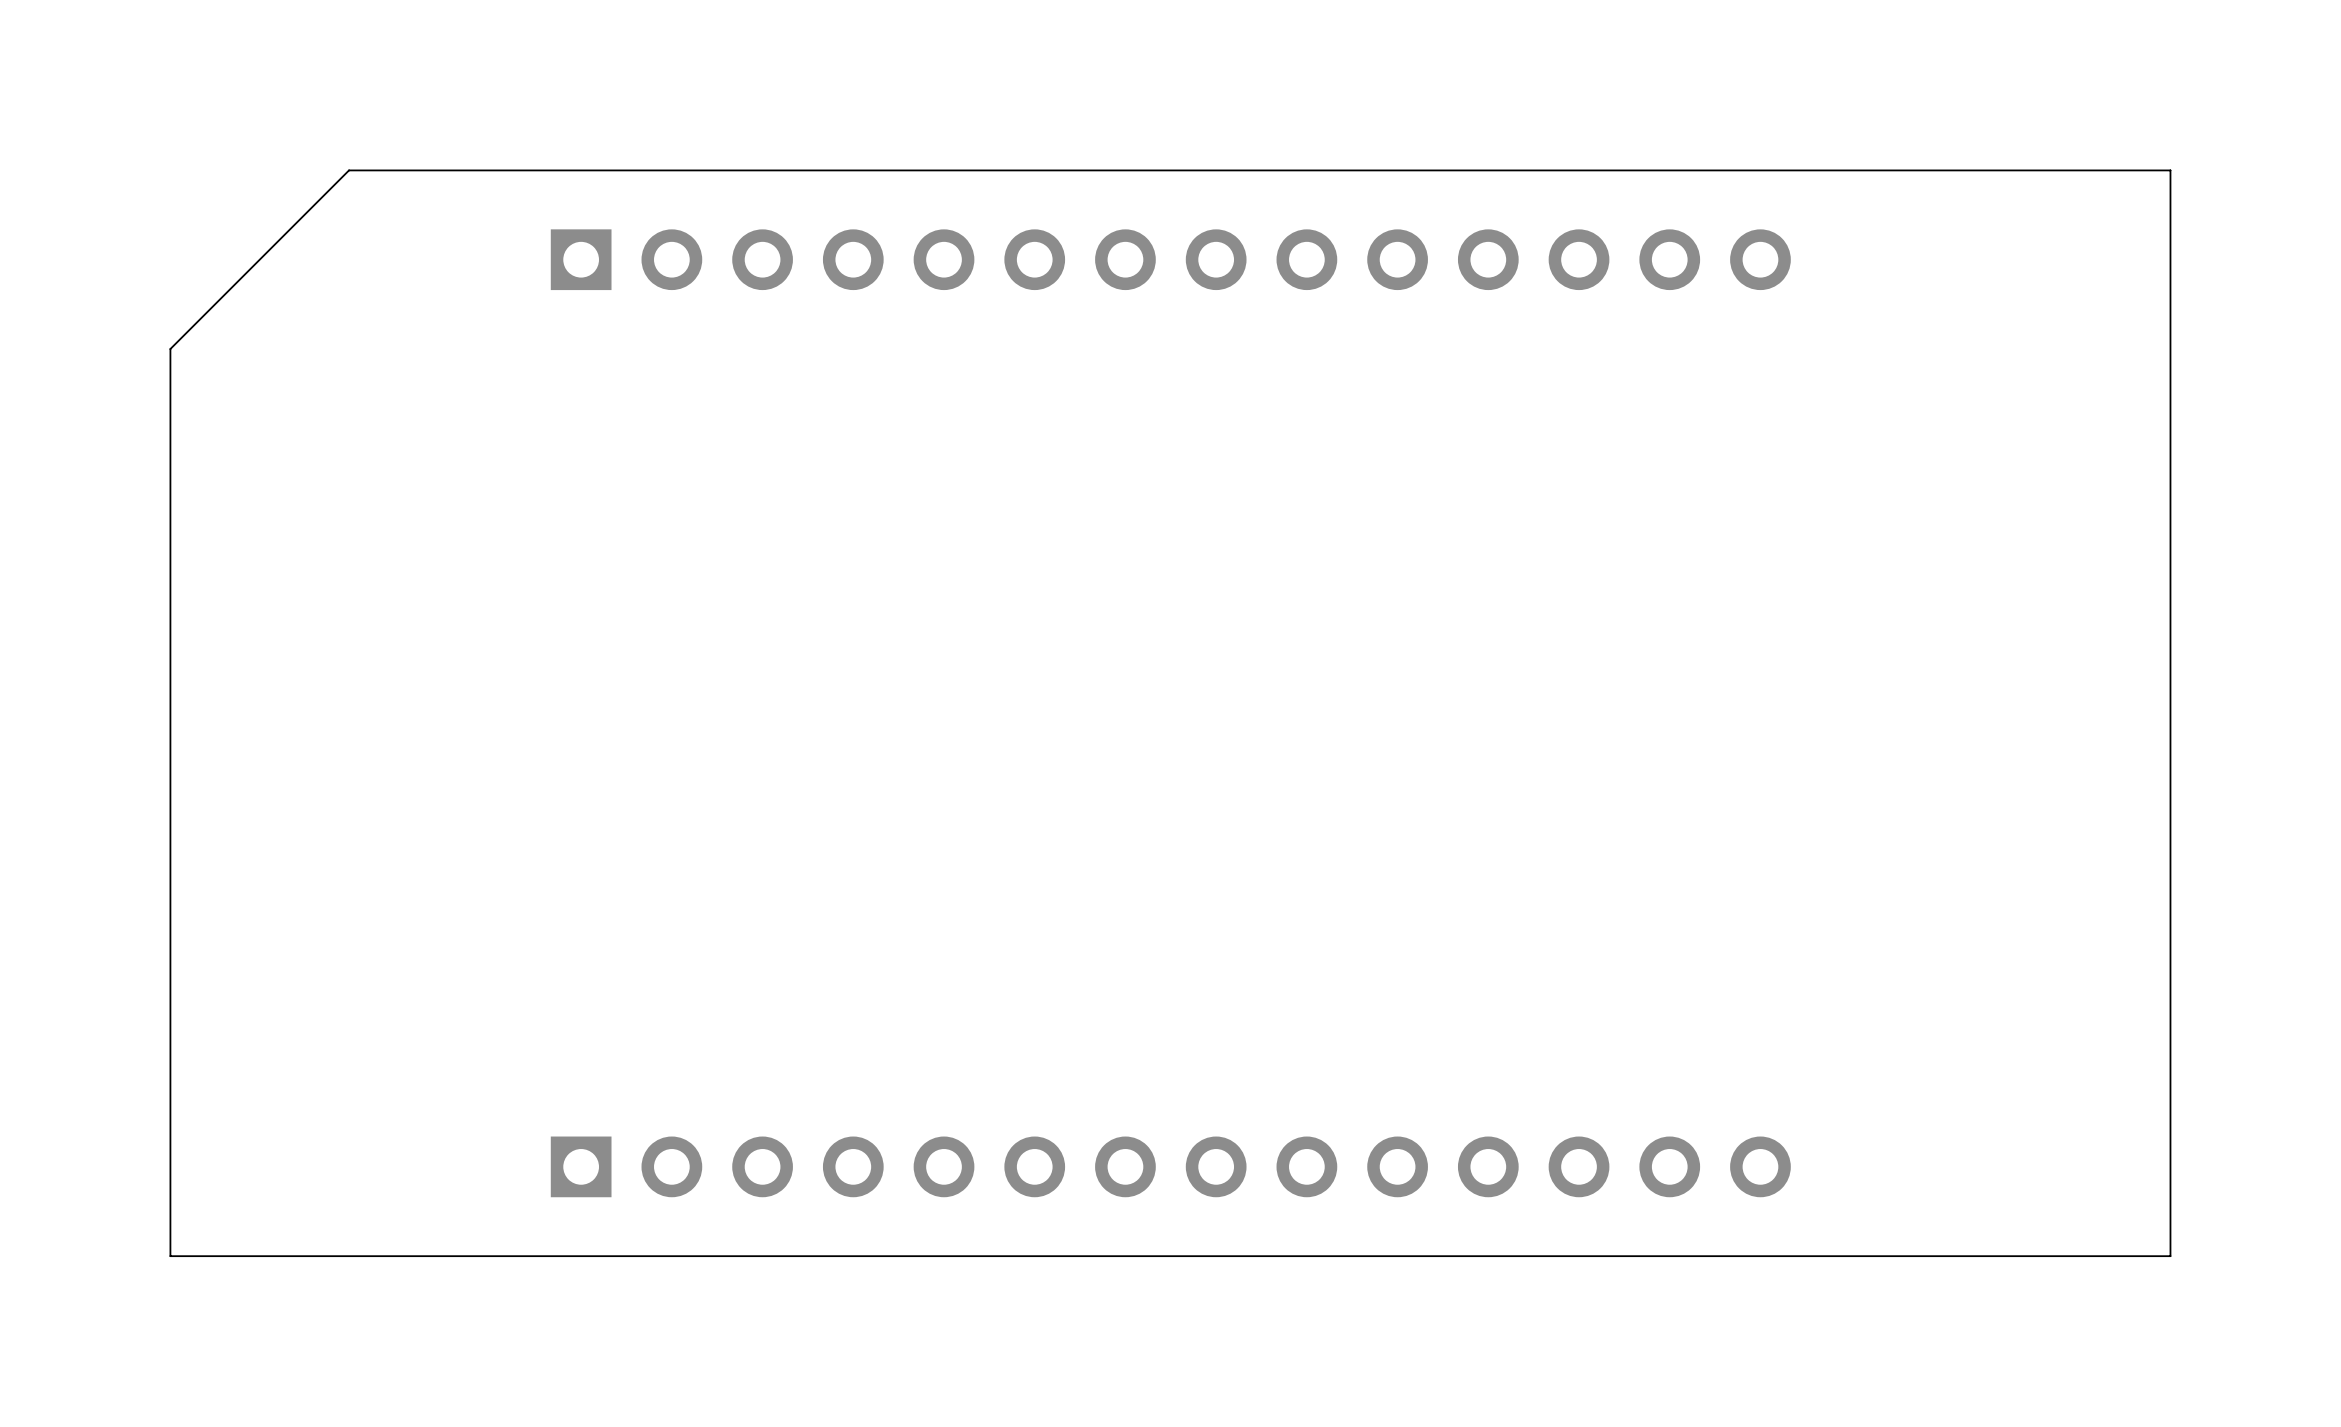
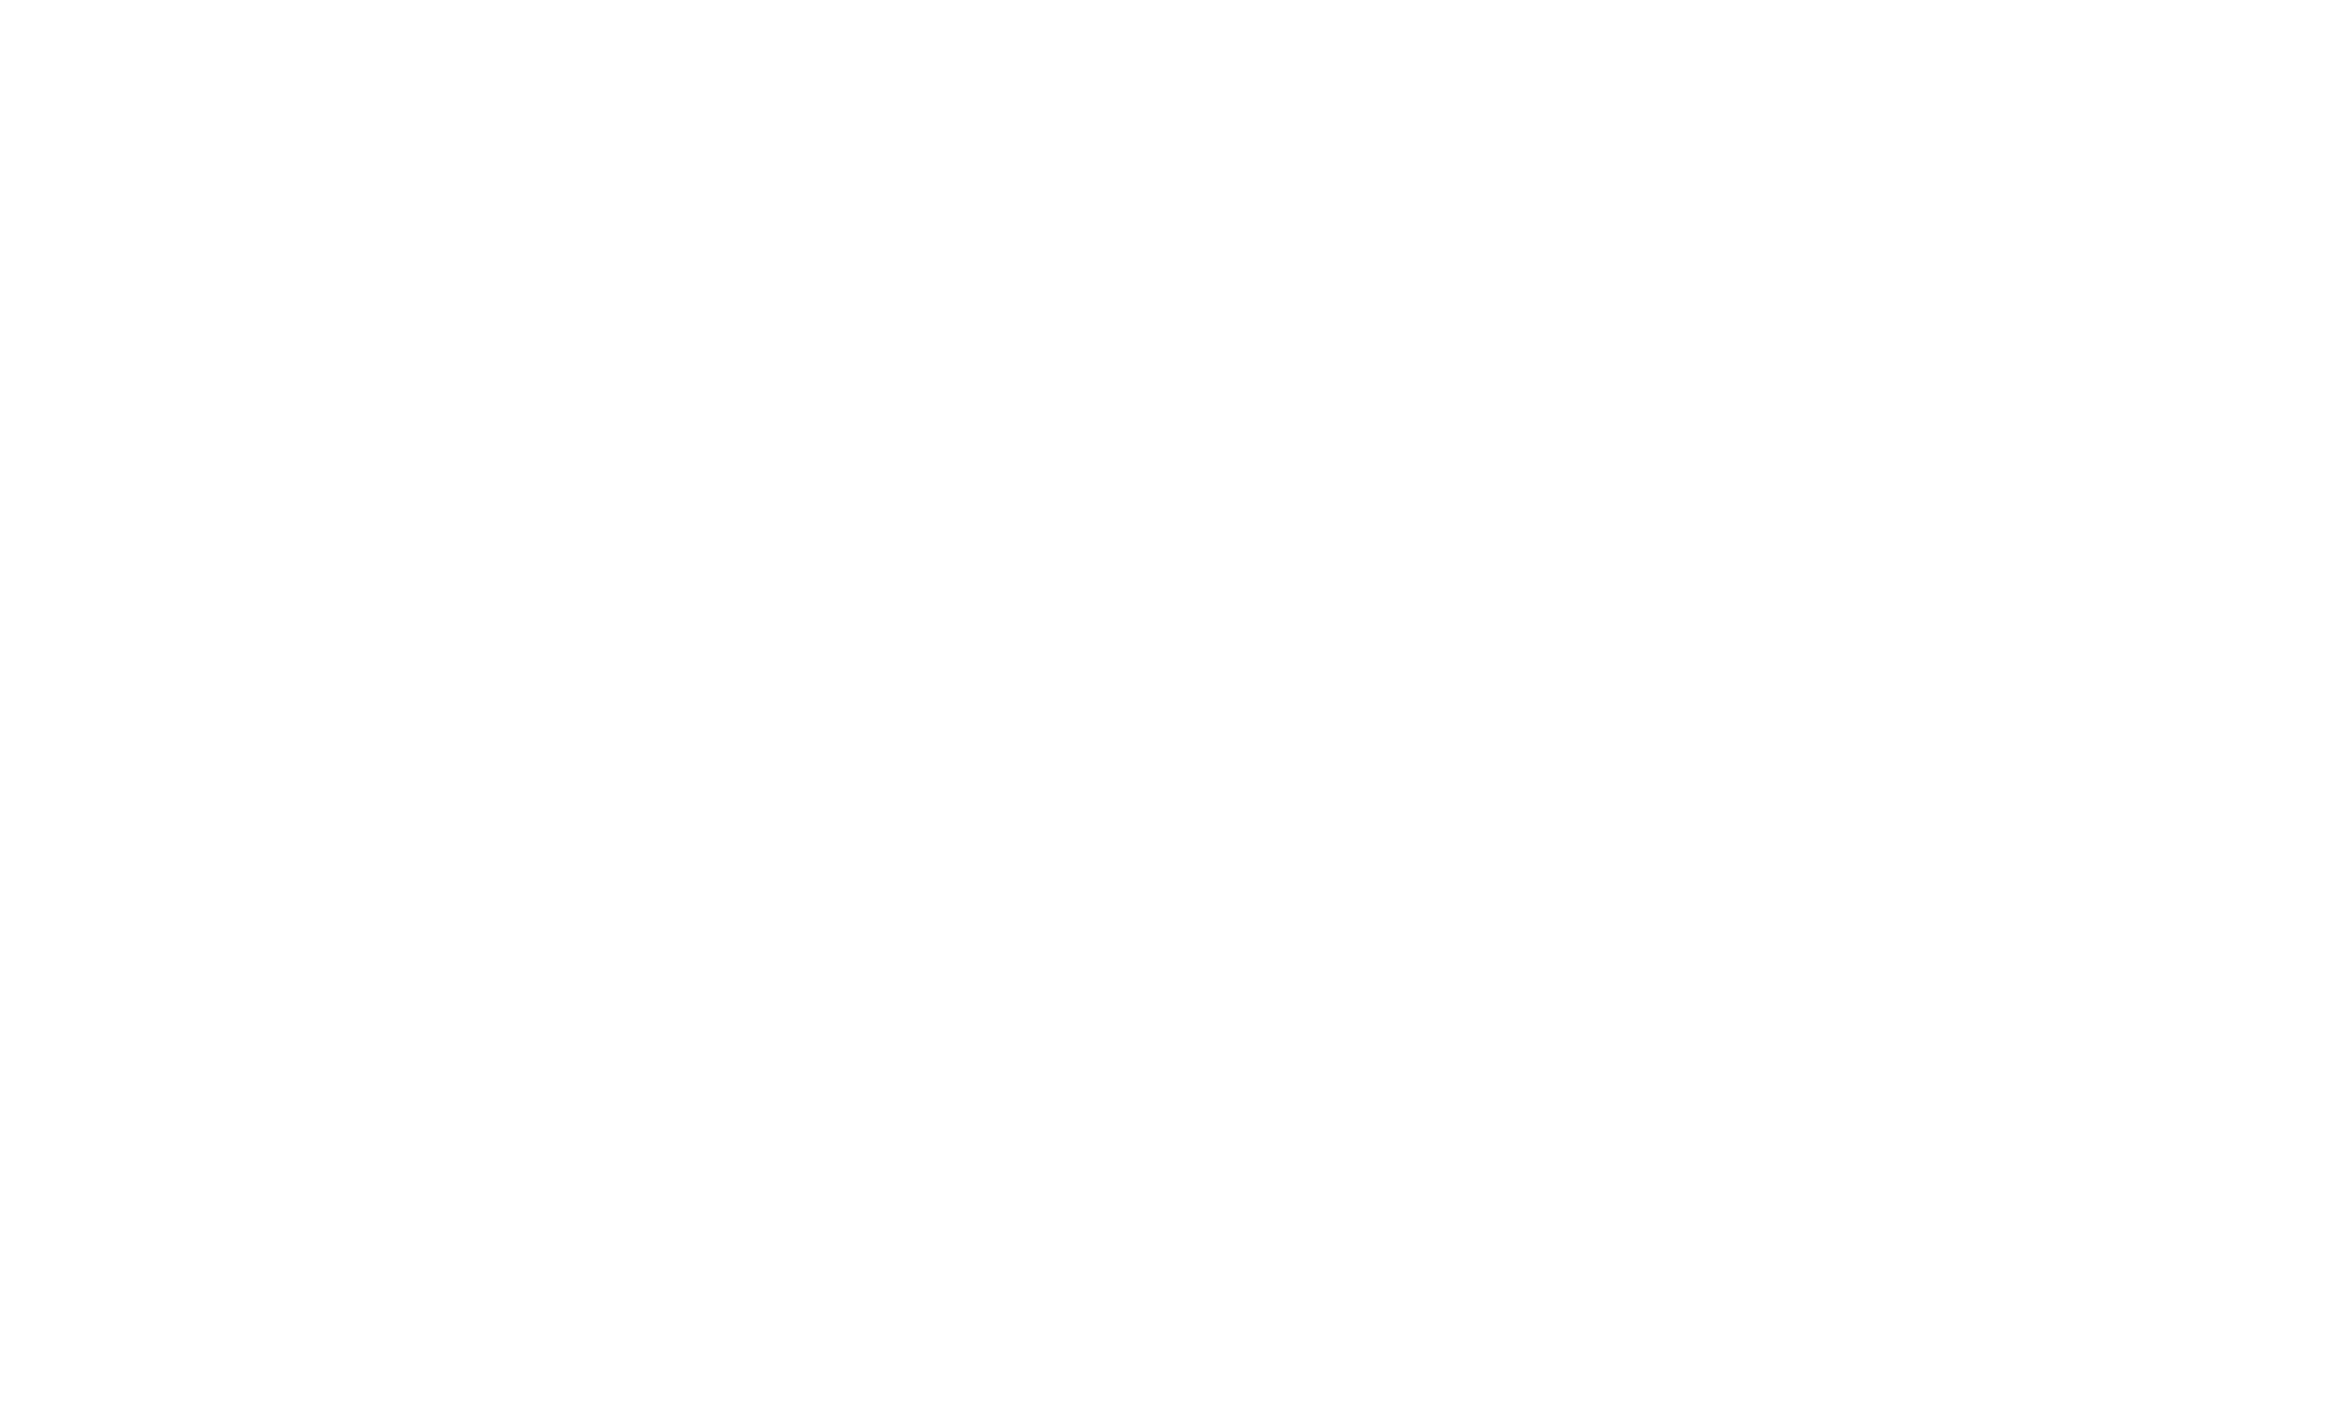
board edge: (2170, 170) (2170, 1256) (170, 1256) (170, 349) (349, 170) (2170, 170) -> none
part: (1170, 259) -> none
part: (1170, 1166) -> none

